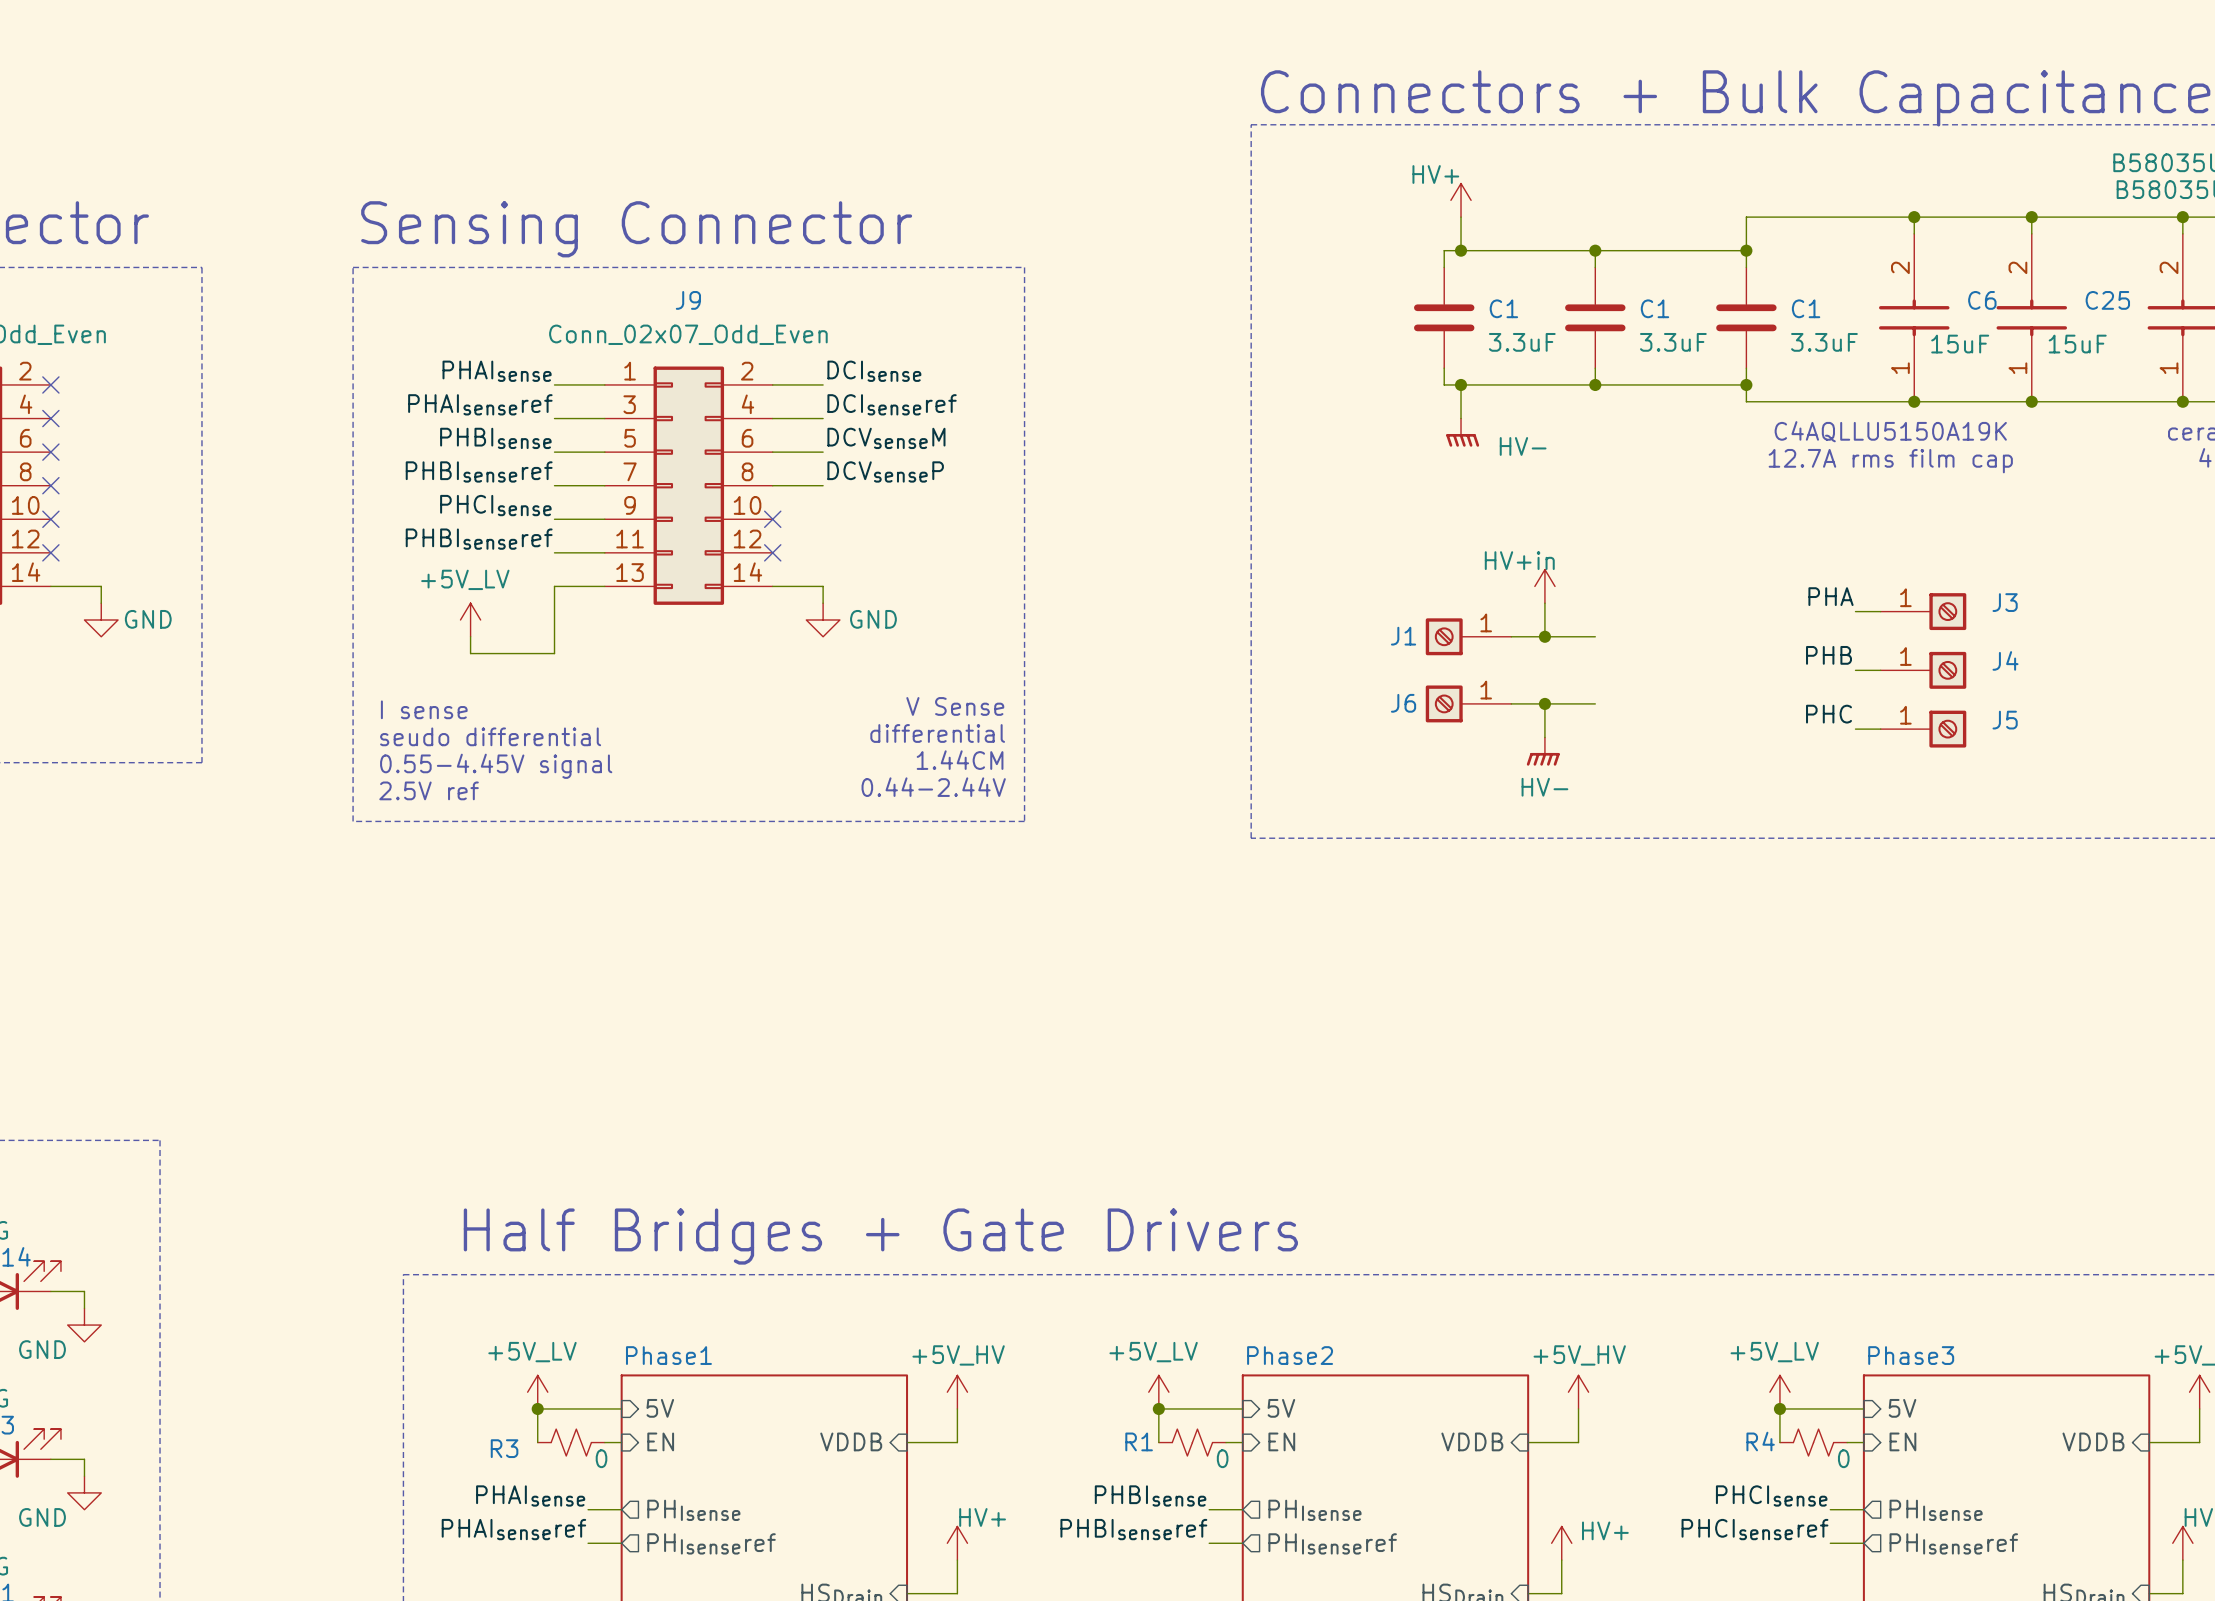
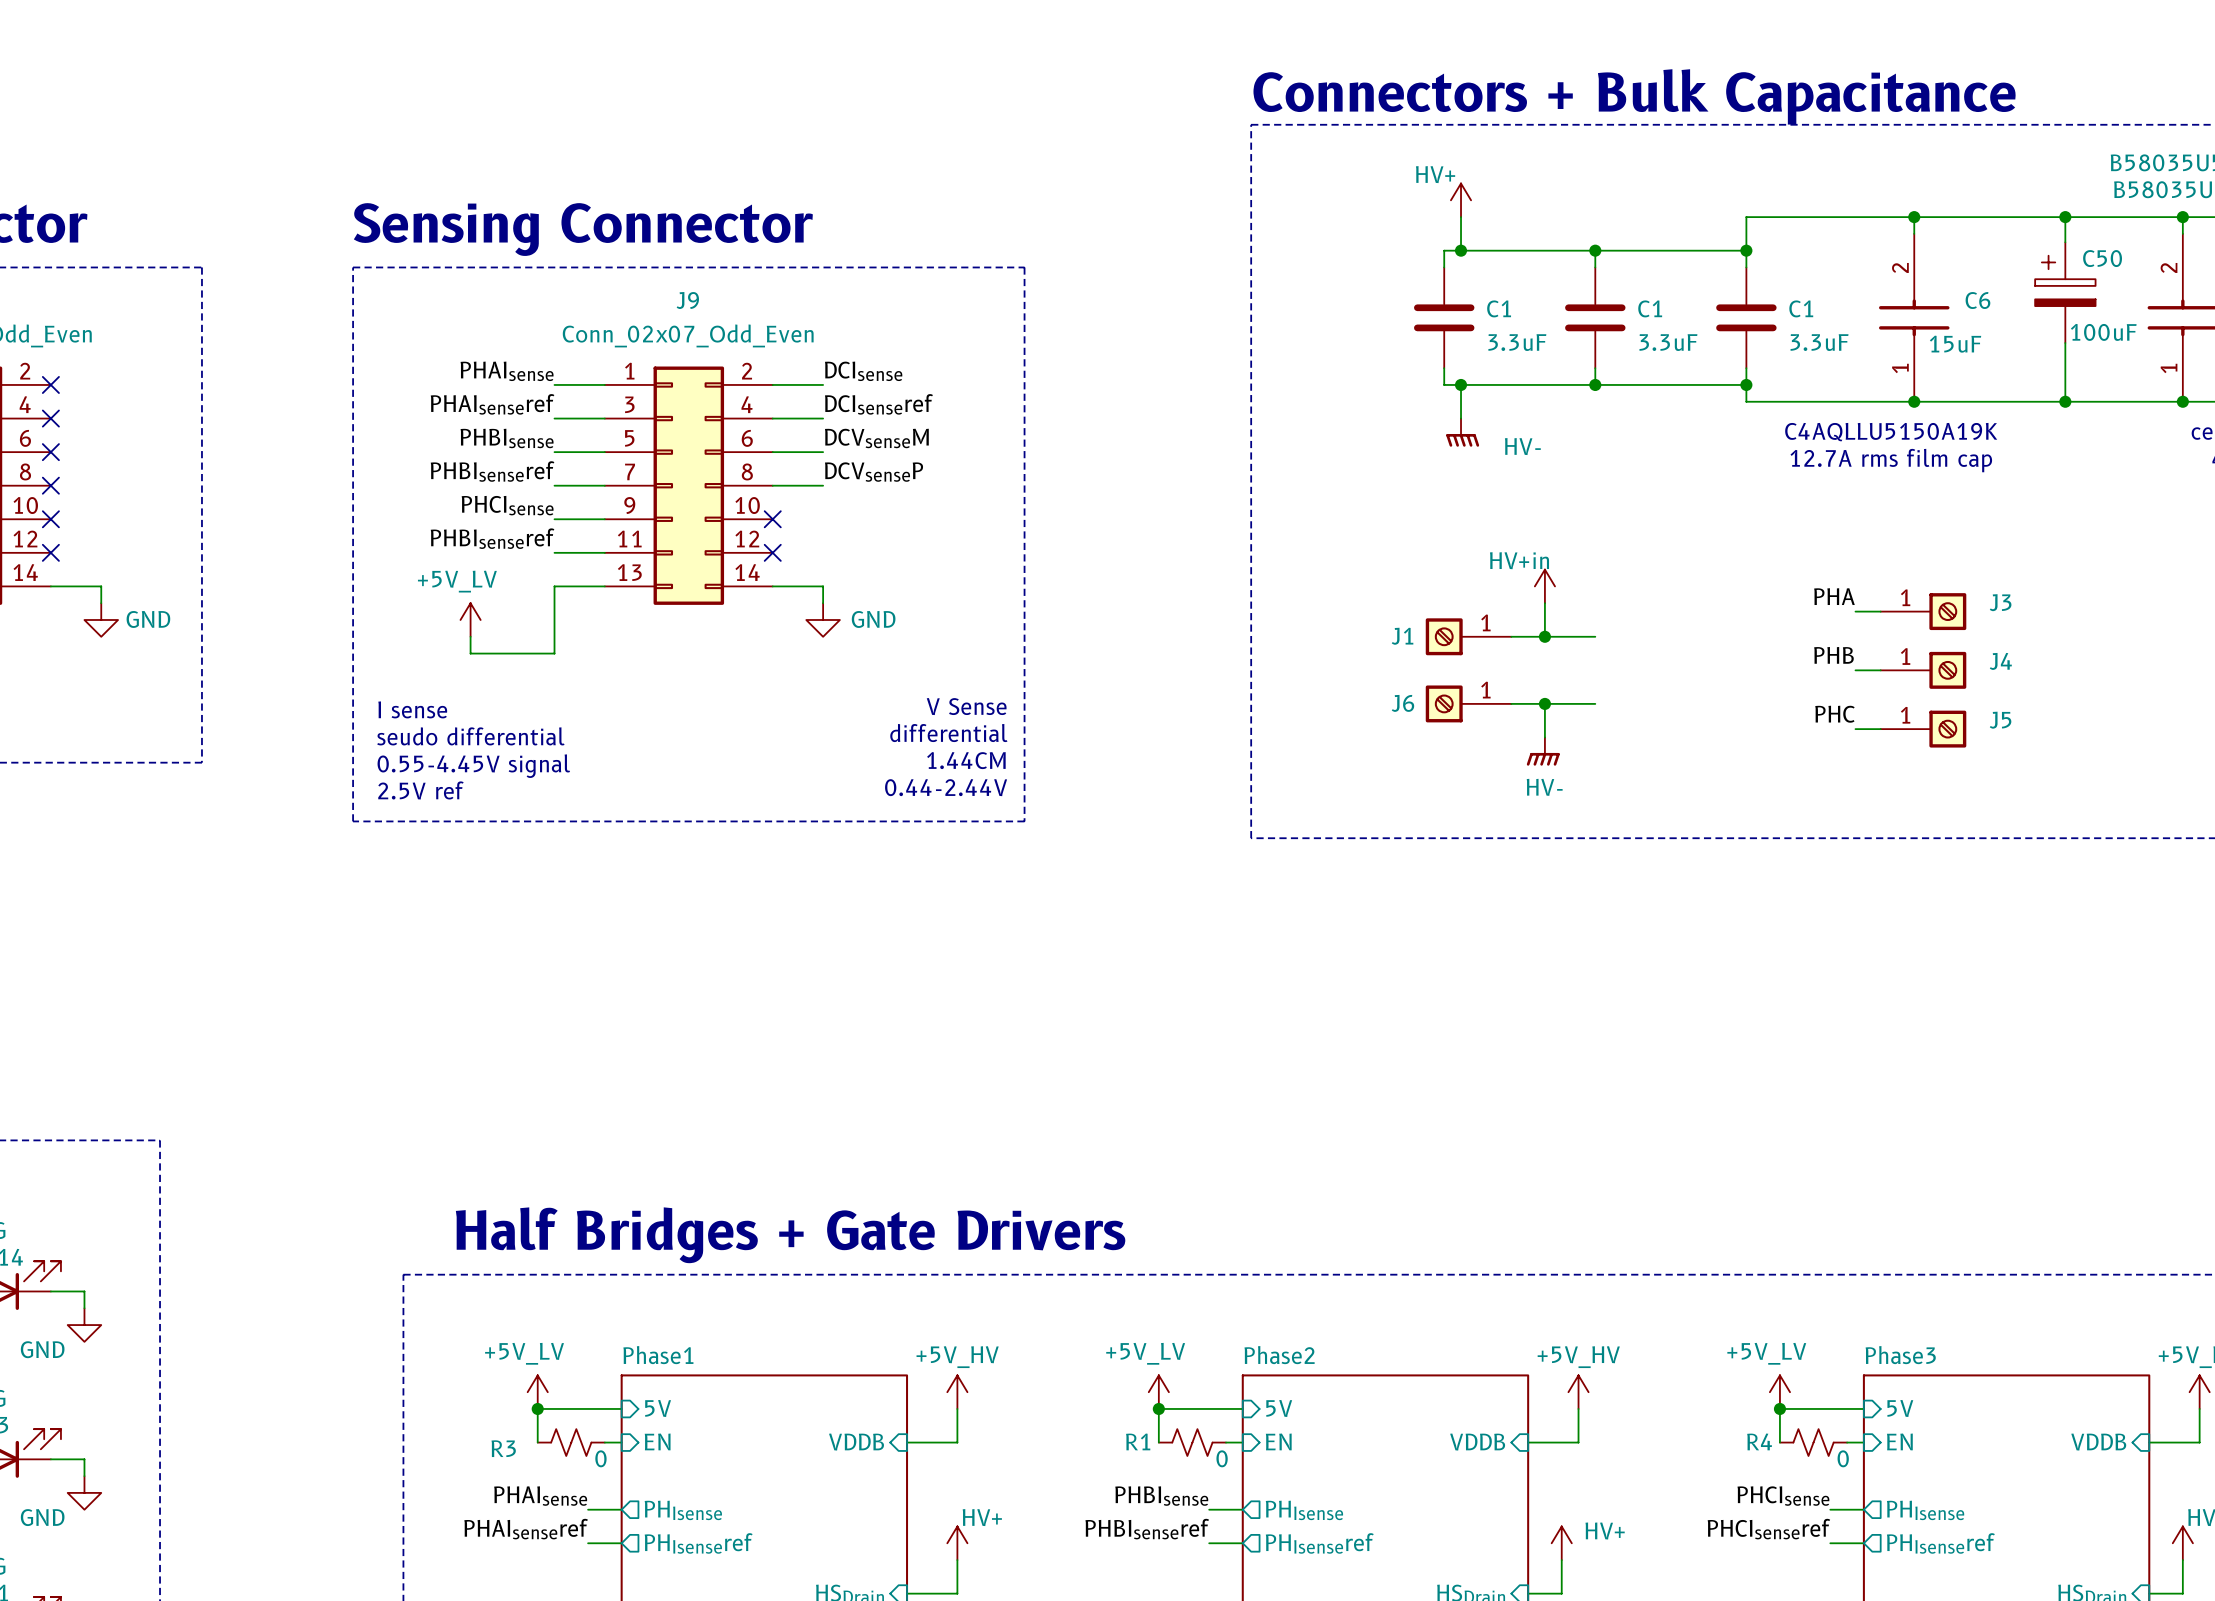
wire: (2031, 217) (2031, 233) -> none
junction position: (2031, 217) -> (2065, 217)
wire: none -> (2065, 217) (2065, 242)
C50: none -> 100uF (2065, 292)
C25: 15uF (2031, 317) -> none
wire: none -> (2065, 343) (2065, 401)
junction position: (2031, 401) -> (2065, 401)

